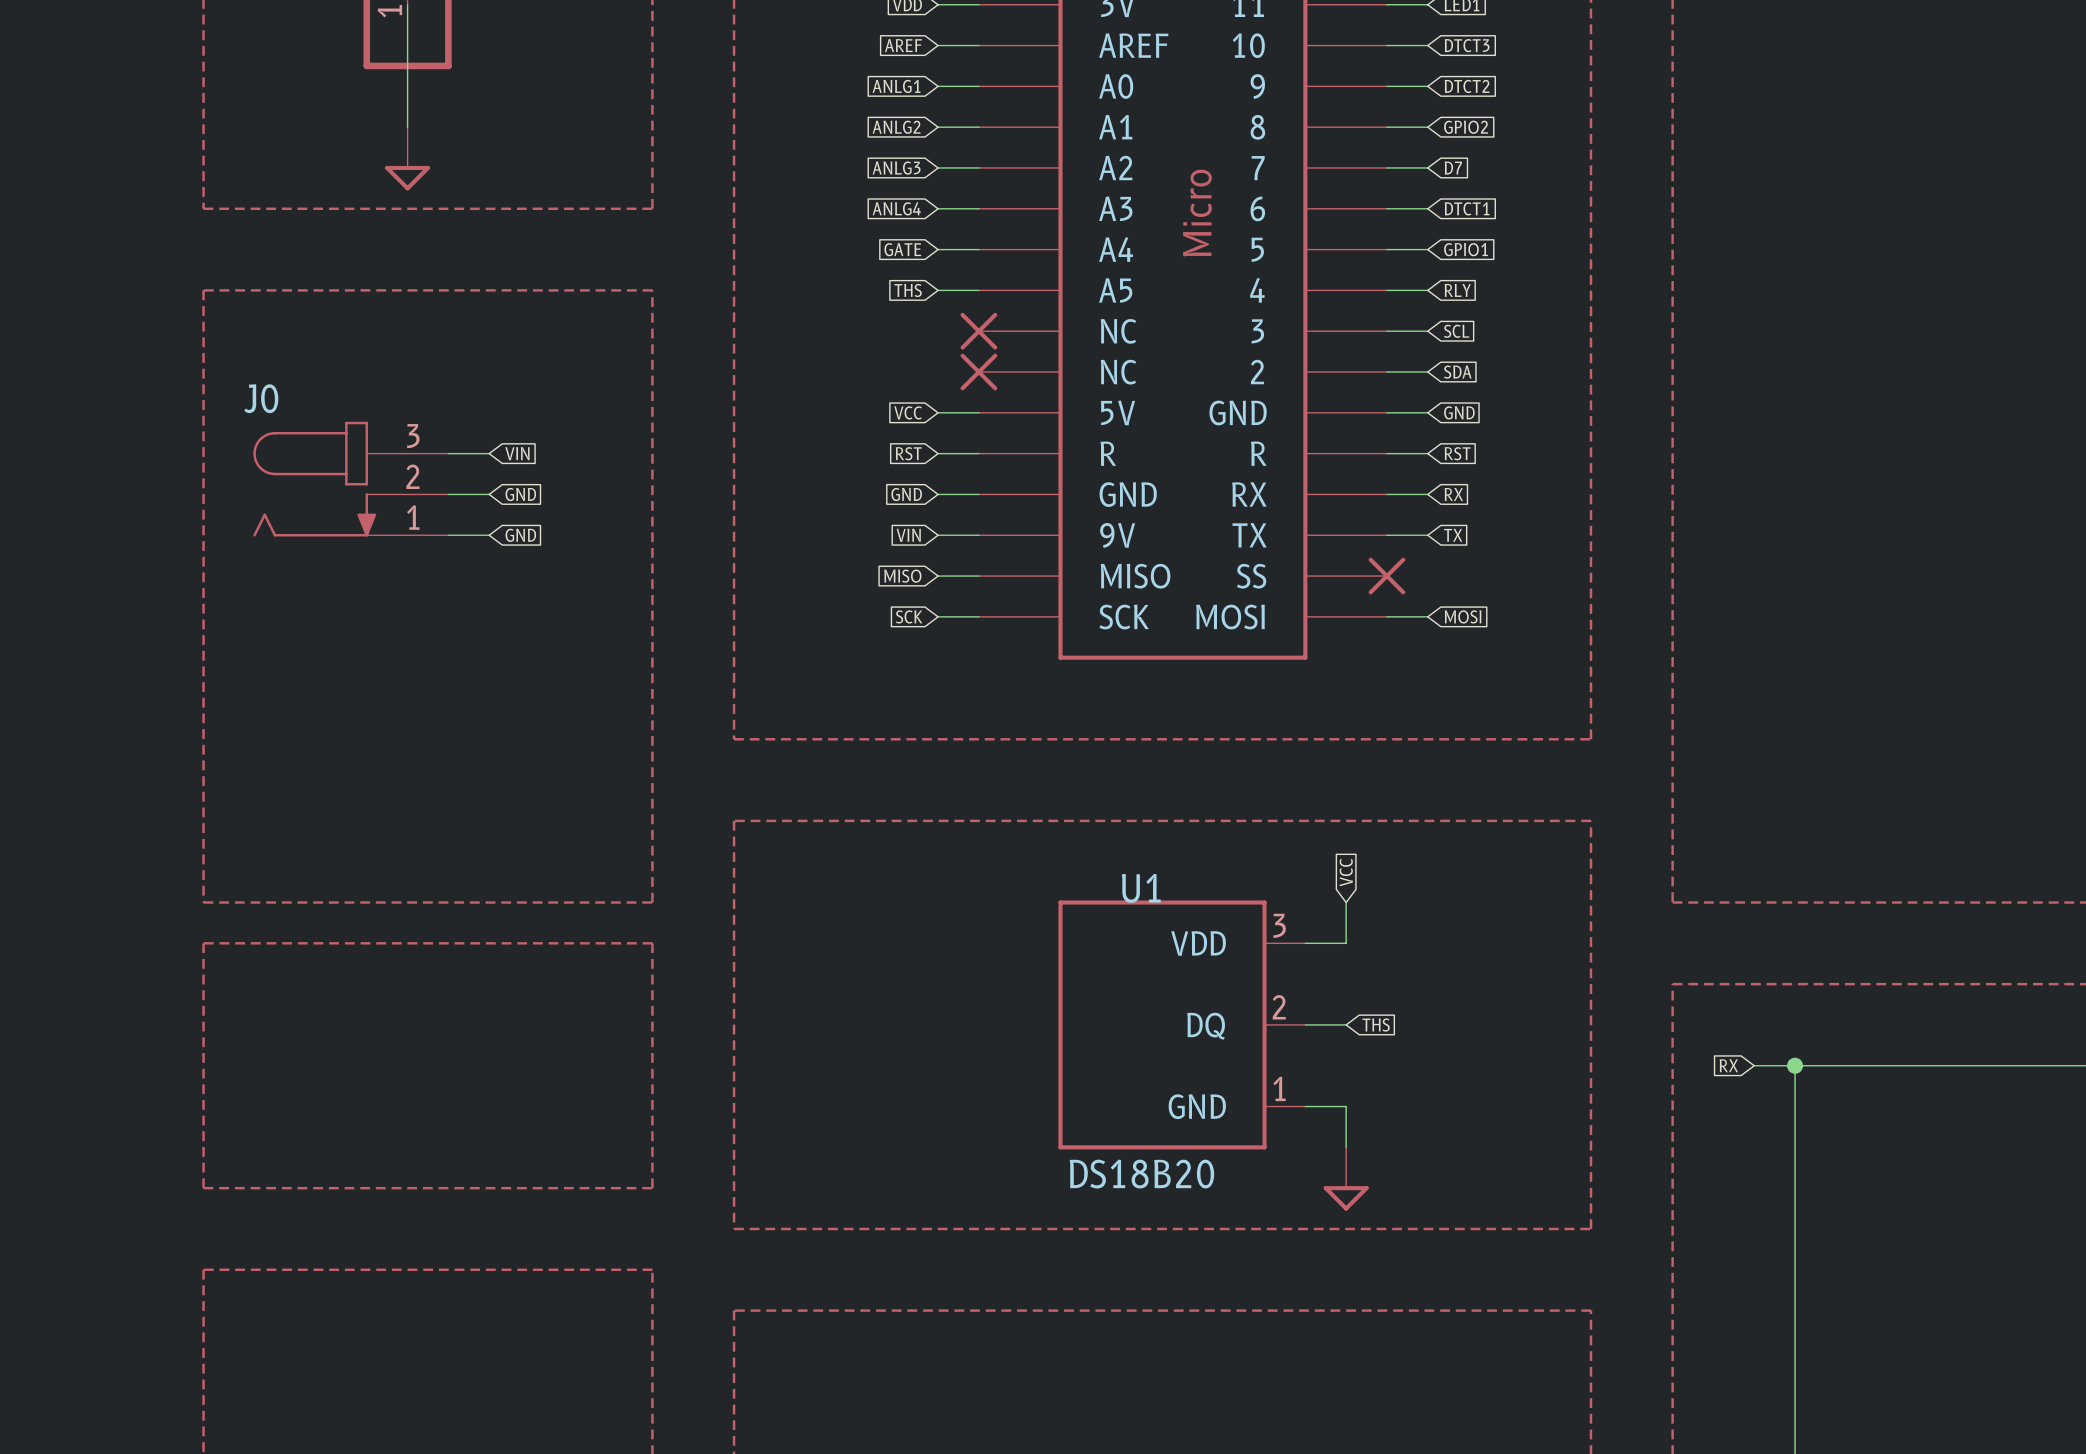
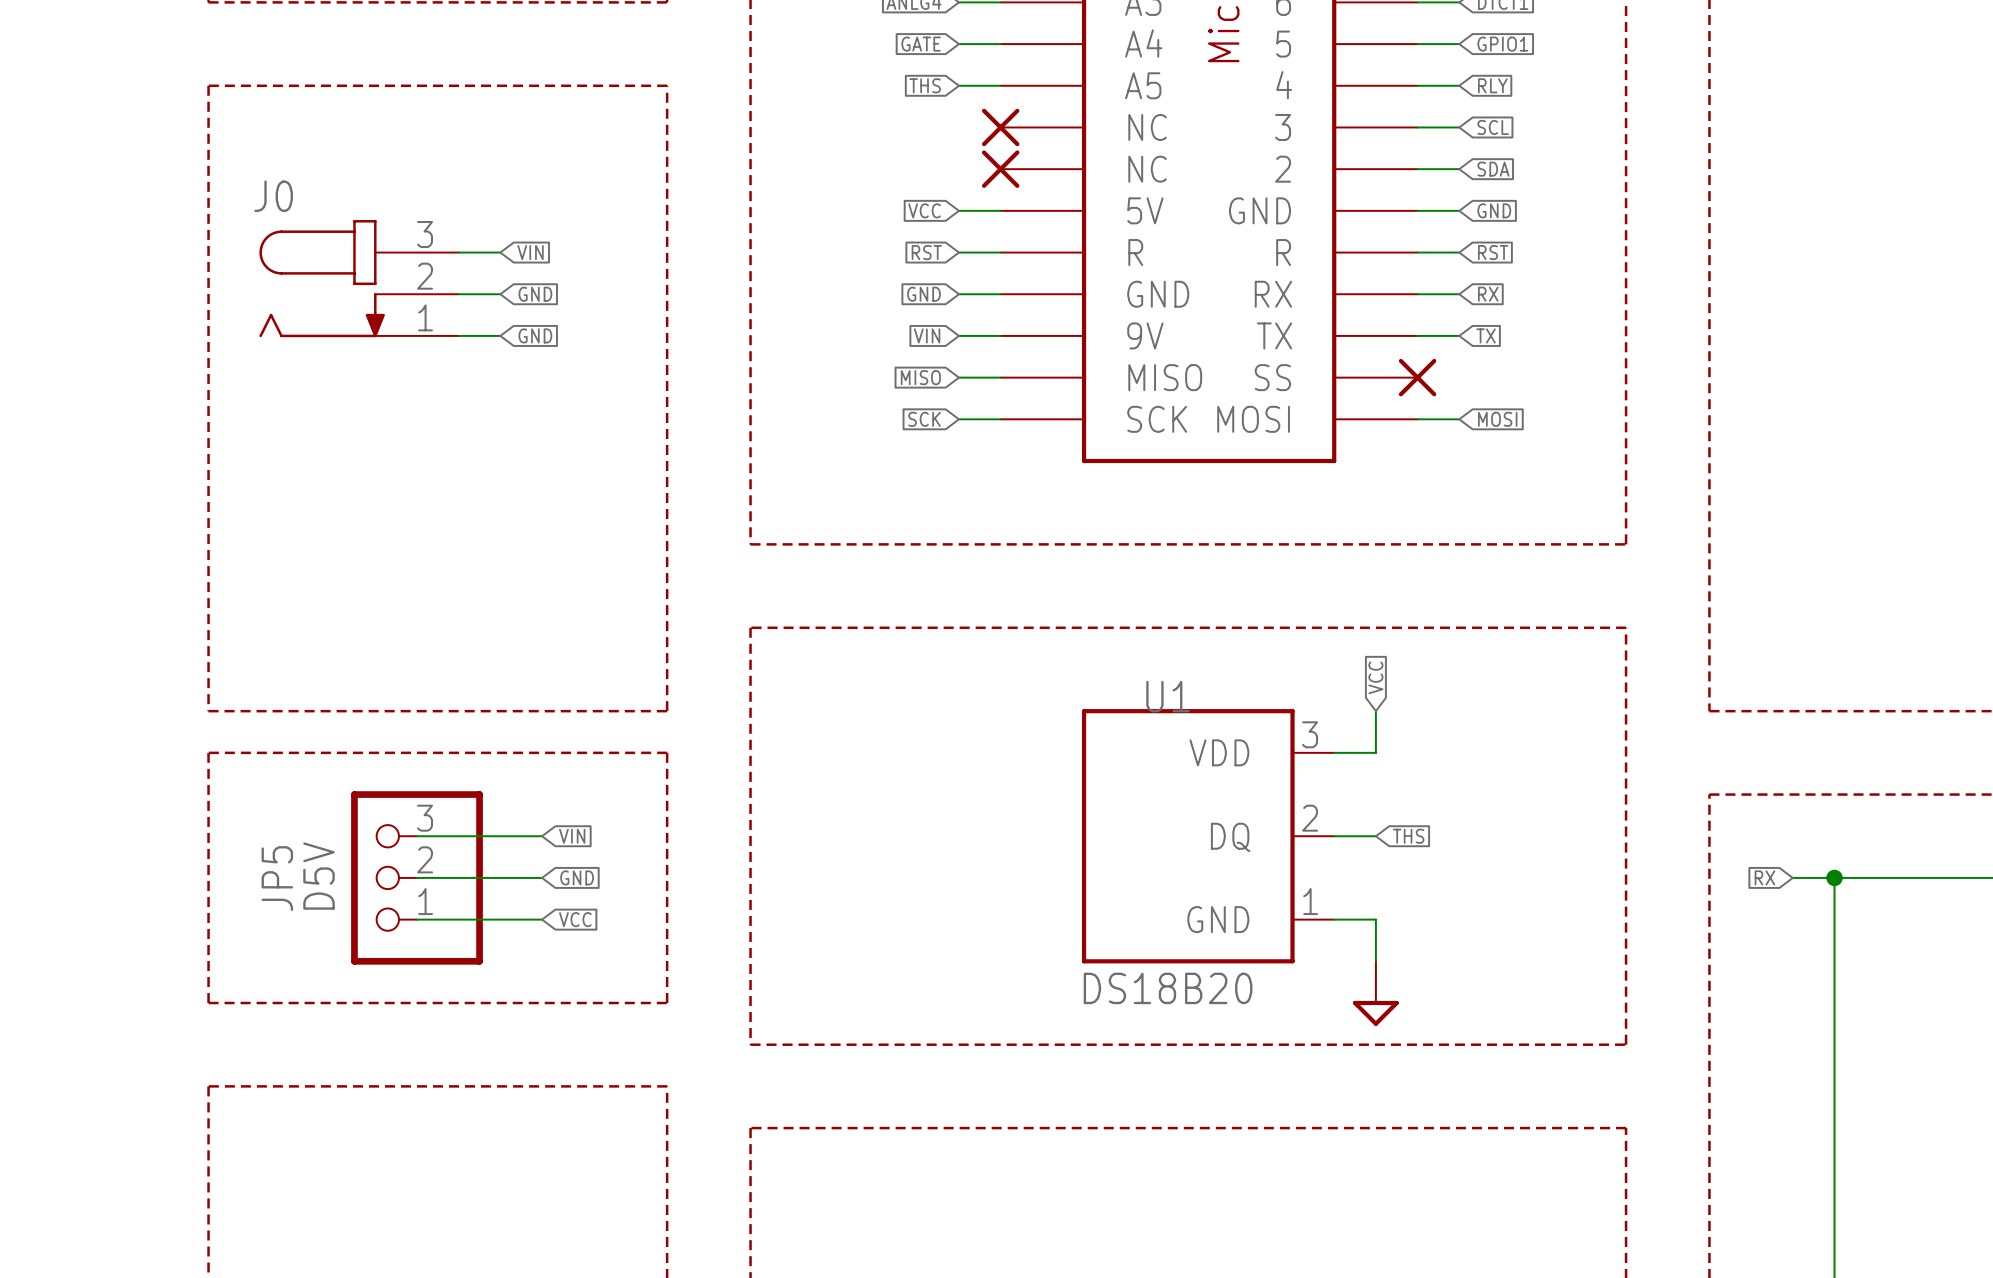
wire: none -> (416, 836) (542, 836)
global label: none -> VIN (572, 836)
wire: none -> (416, 877) (542, 877)
JP5: none -> D5V (416, 877)
global label: none -> GND (577, 877)
wire: none -> (416, 919) (542, 919)
global label: none -> VCC (575, 919)

